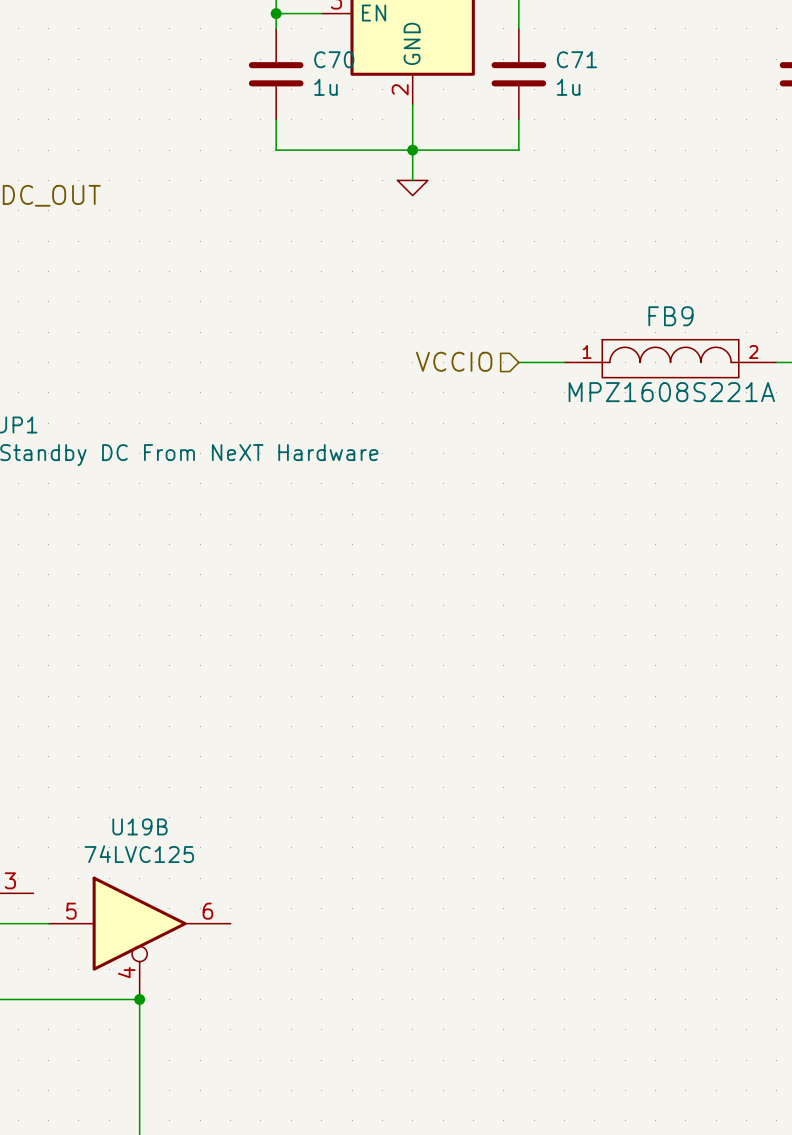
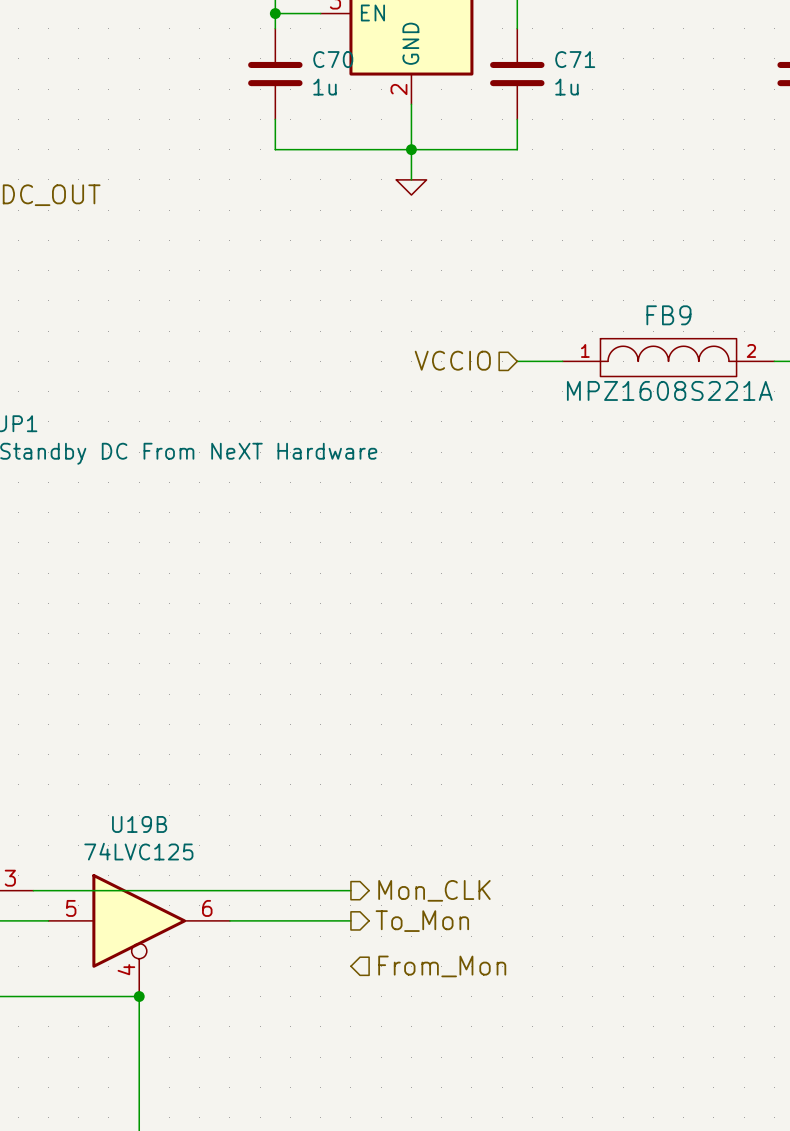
wire: none -> (33, 890) (350, 890)
hierarchical label: none -> Mon_CLK (434, 890)
wire: none -> (229, 920) (350, 920)
hierarchical label: none -> To_Mon (422, 921)
hierarchical label: none -> From_Mon (442, 966)

